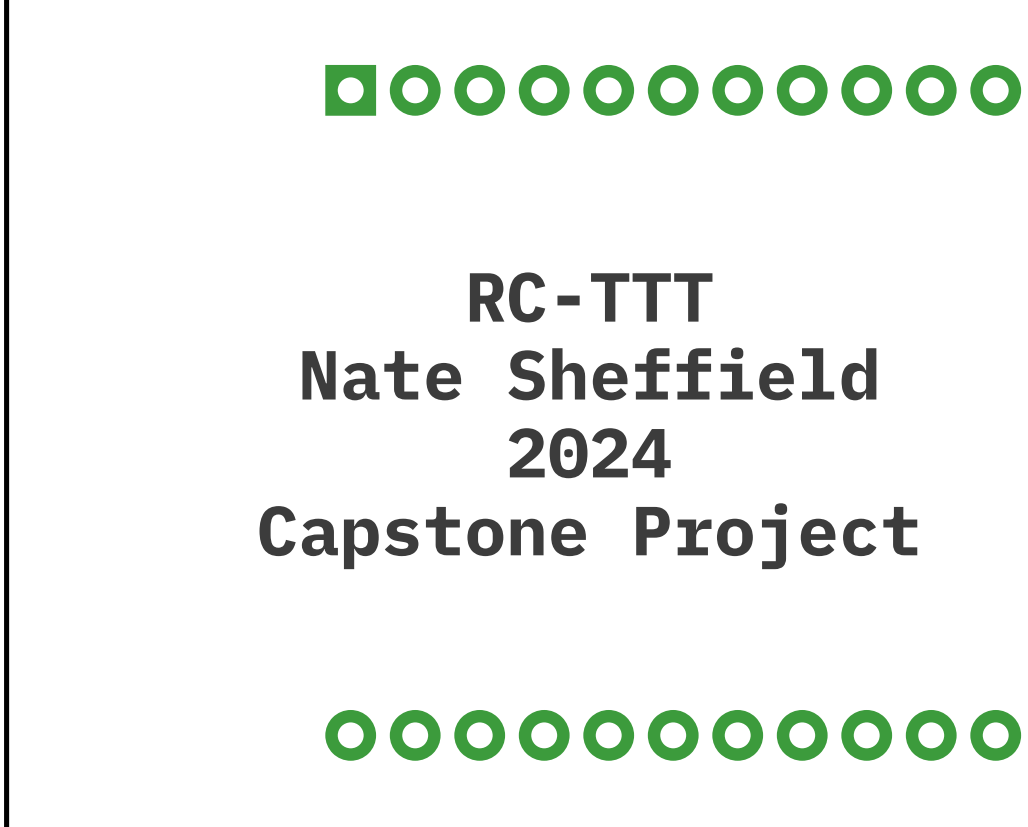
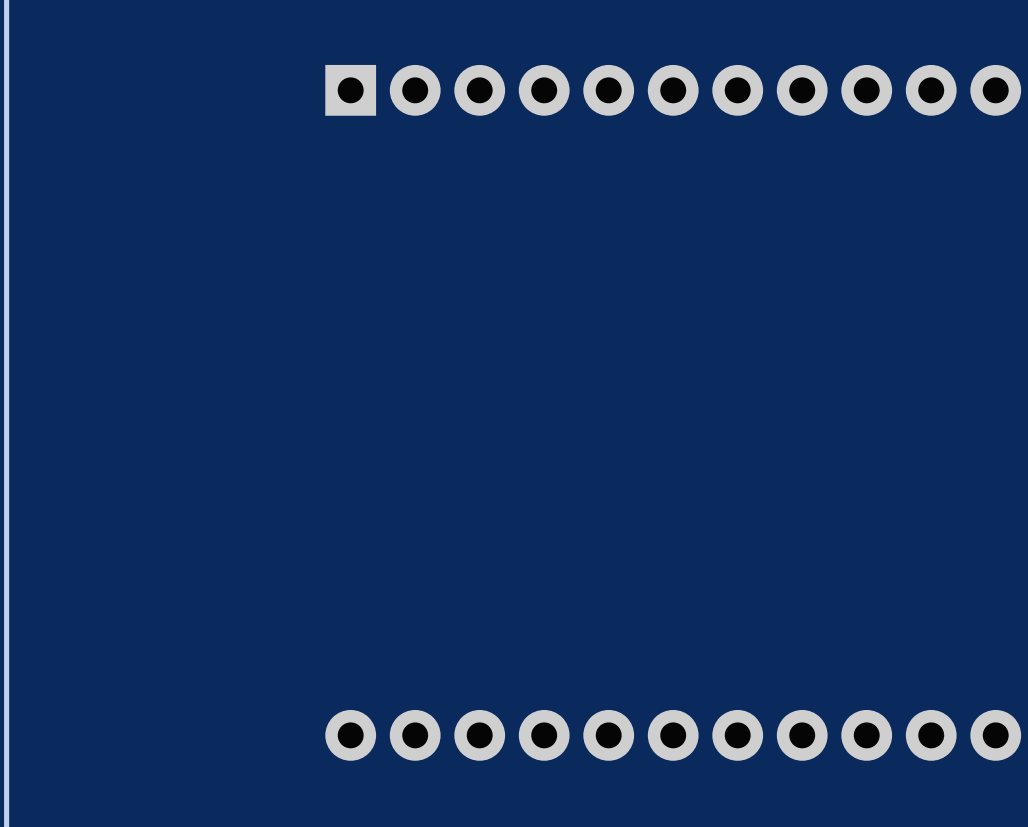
text: RC-TTT (591, 297) -> none
text: Nate Sheffield (589, 373) -> none
text: 2024 (589, 453) -> none
text: Capstone Project (588, 536) -> none

